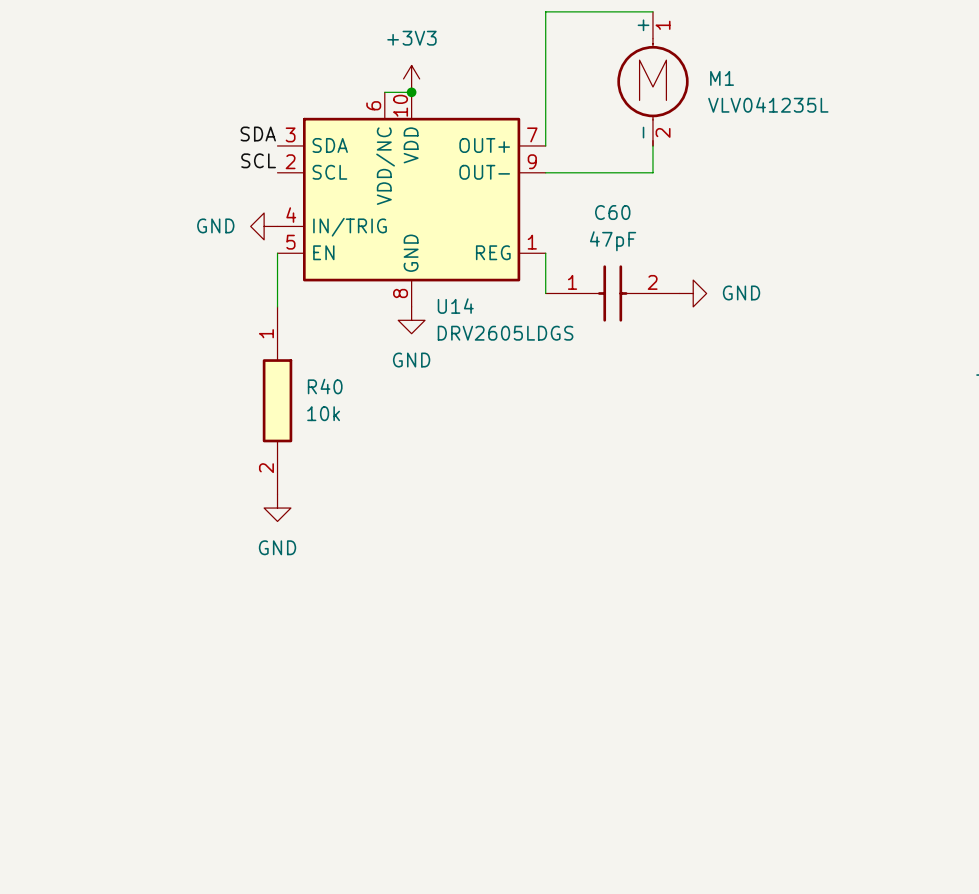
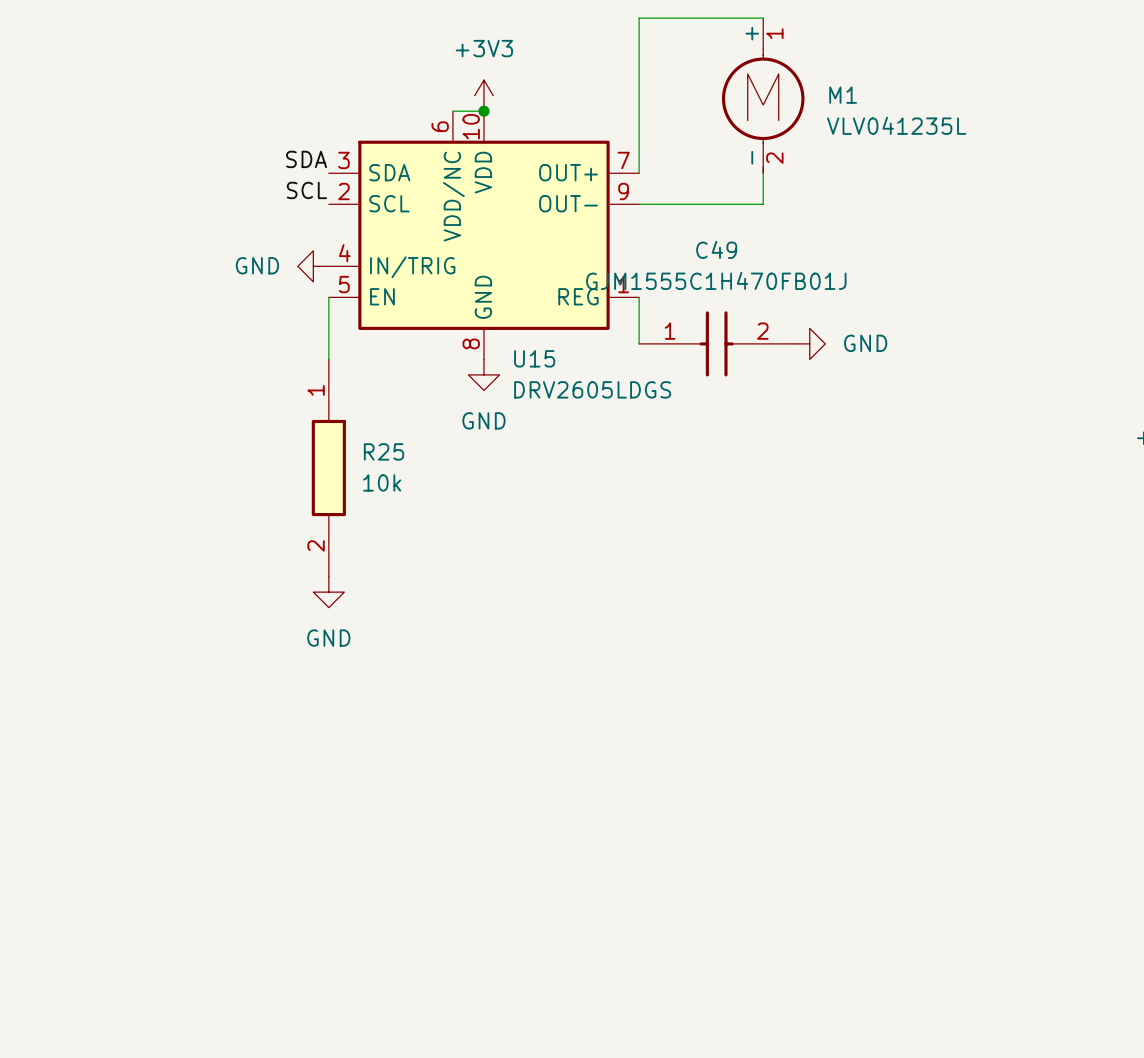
C60 name: C60 (612, 212) -> C49 (716, 249)
C60 value: 47pF (613, 241) -> GJM1555C1H470FB01J (716, 280)
U14 name: U14 (455, 306) -> U15 (534, 358)
R40 name: R40 (325, 386) -> R25 (384, 451)

